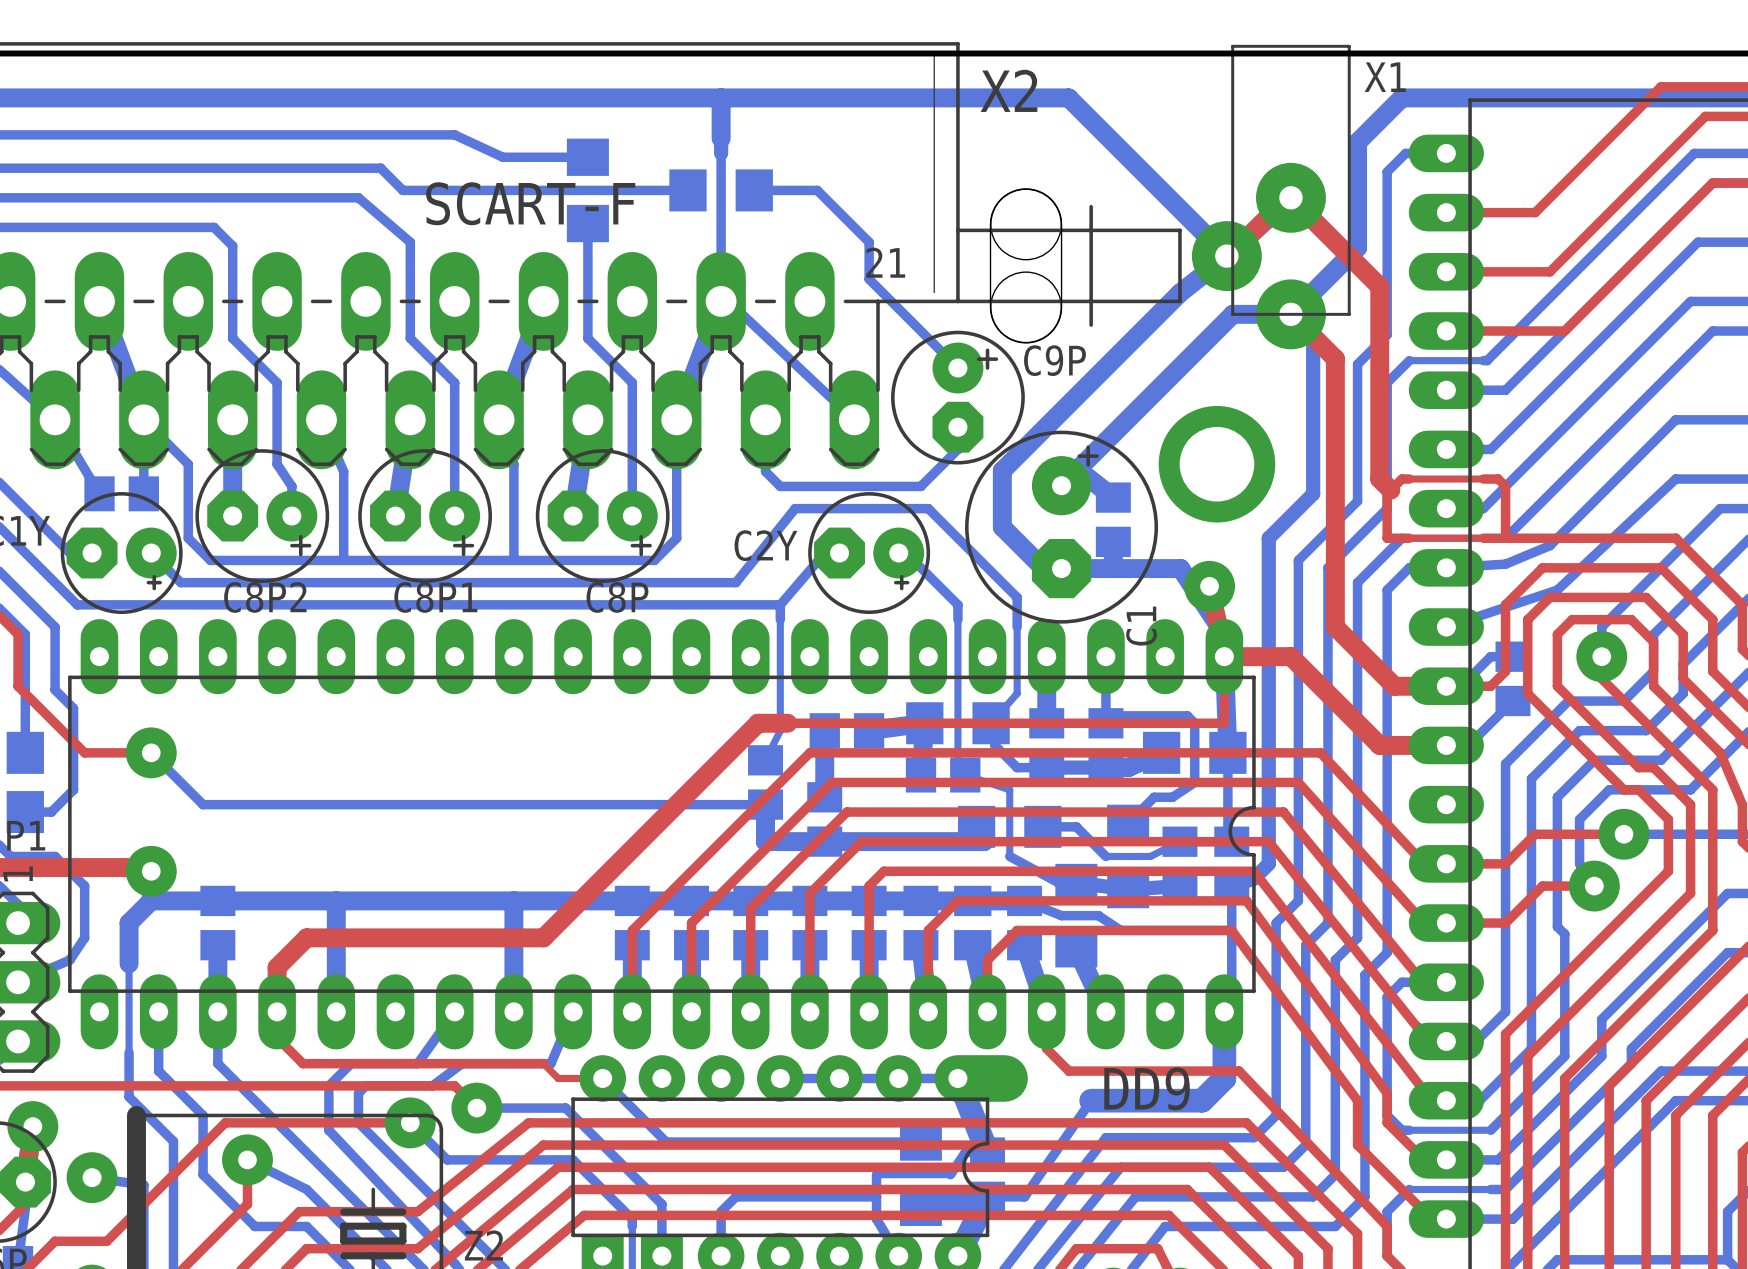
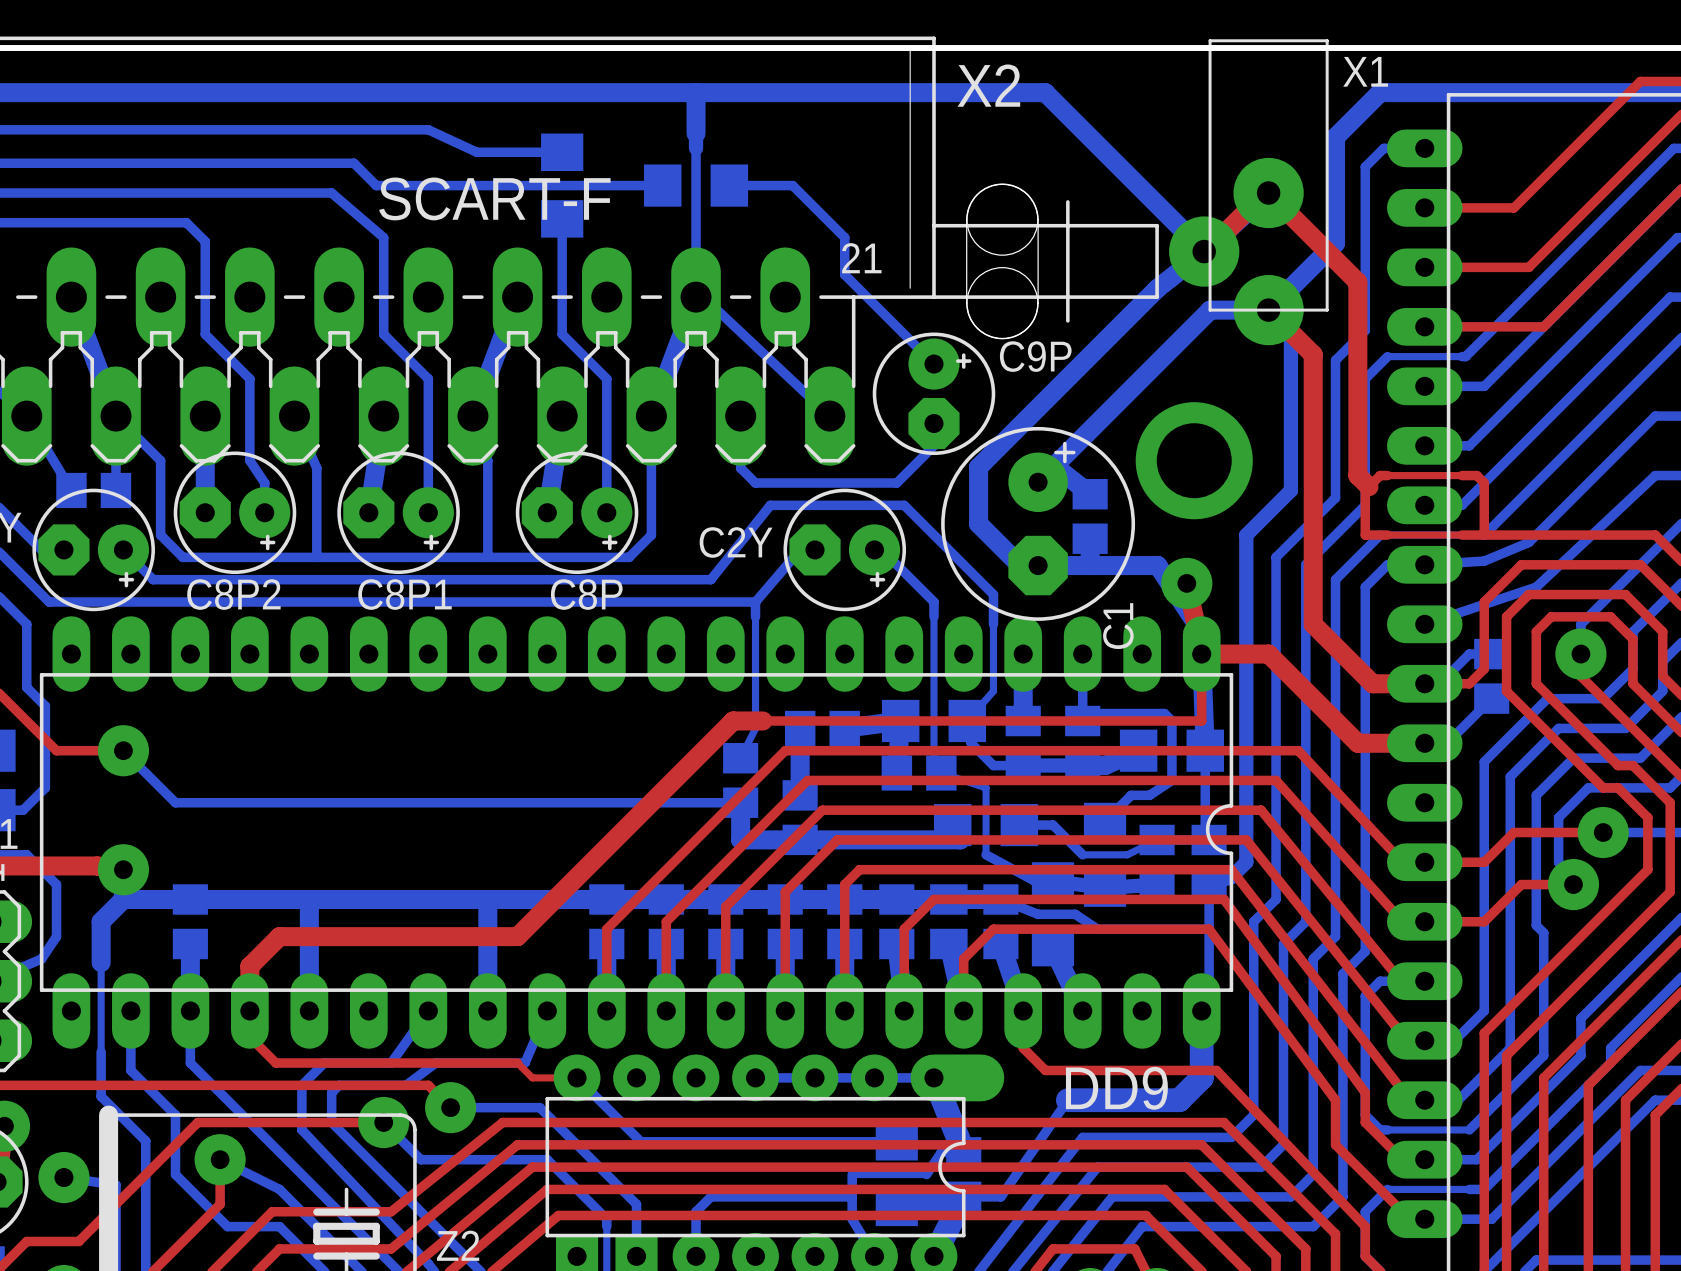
C9P footprint: [891, 330, 1025, 465] -> [872, 332, 996, 456]
C8P2 footprint: [195, 449, 330, 583] -> [173, 451, 297, 575]
C8P1 footprint: [358, 449, 493, 583] -> [337, 451, 460, 575]
C8P footprint: [535, 449, 670, 583] -> [515, 451, 639, 575]

